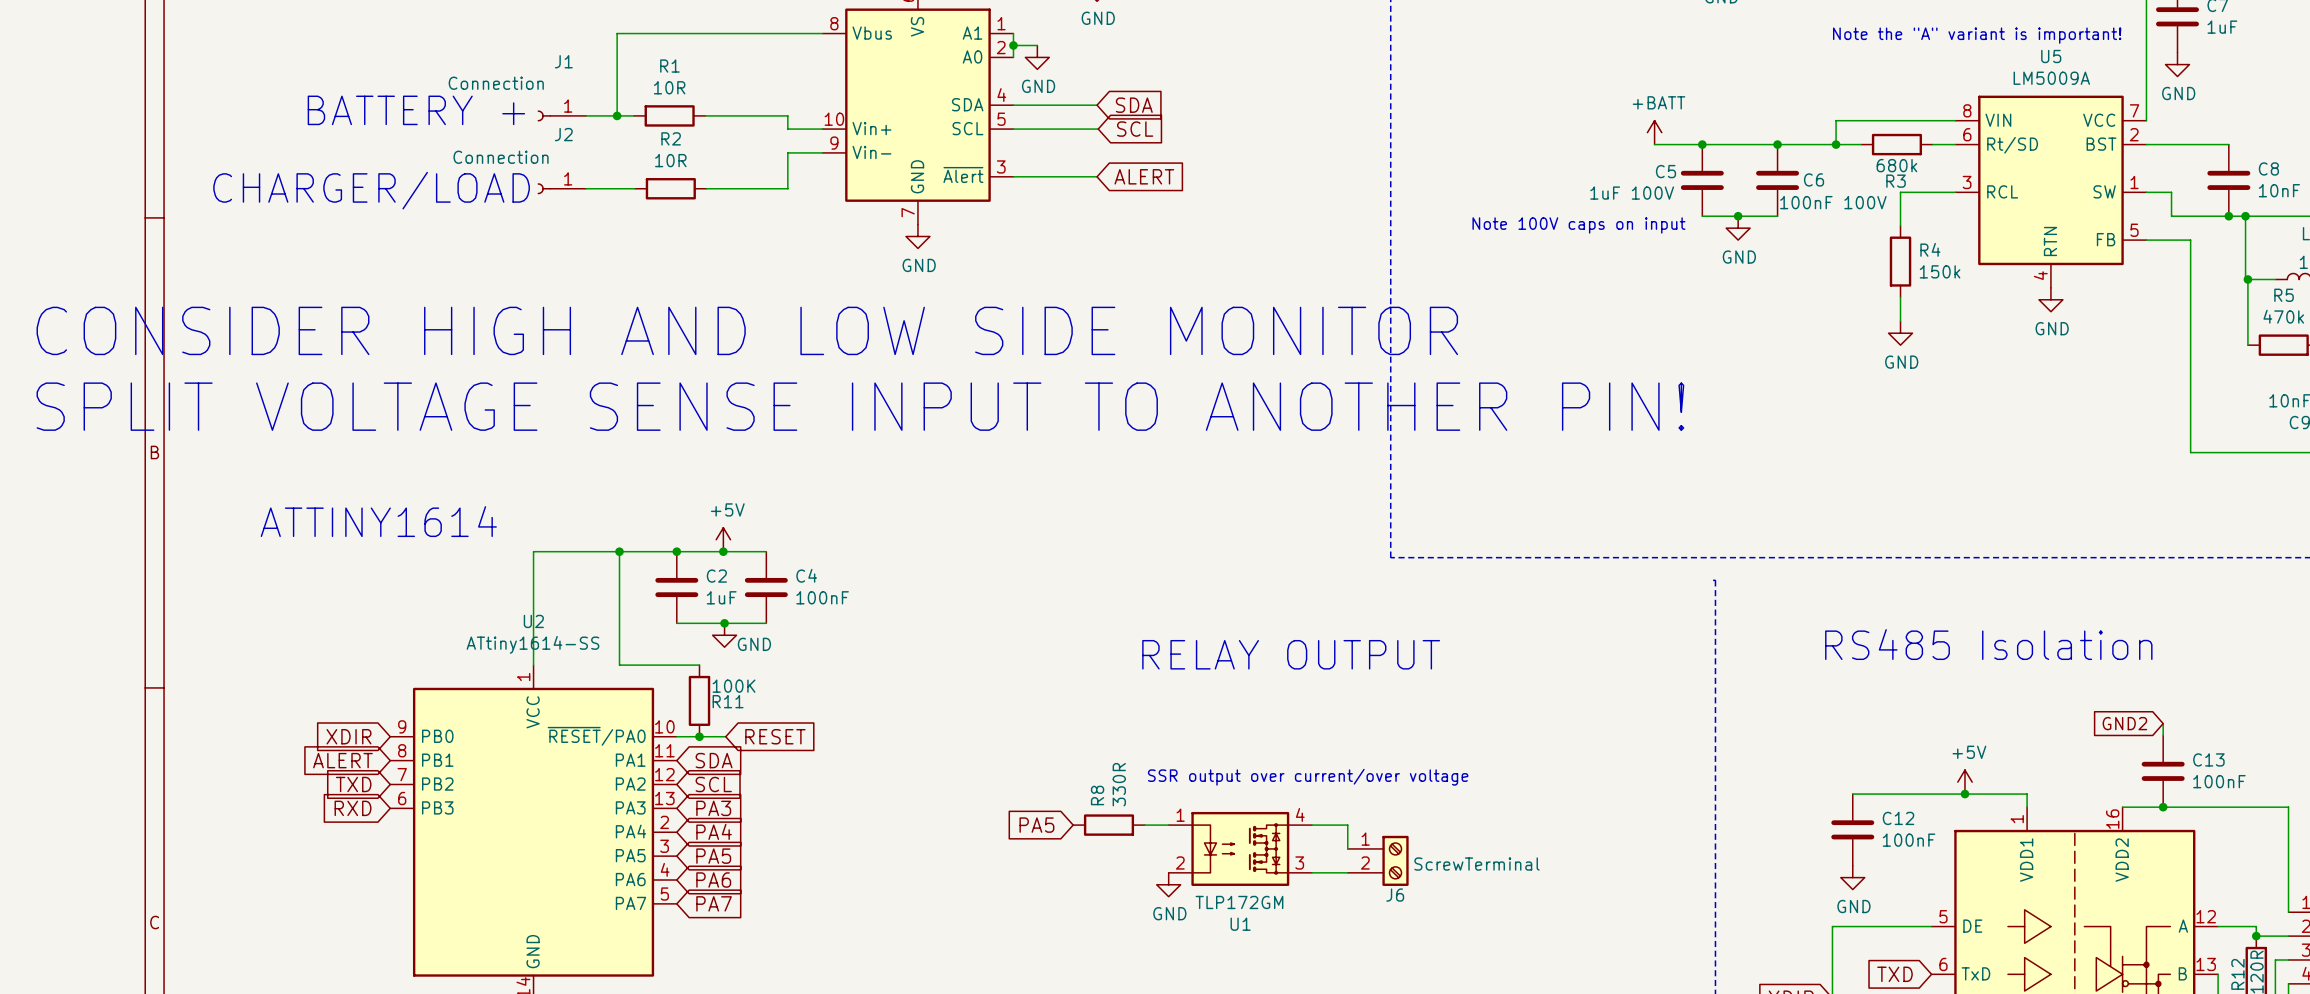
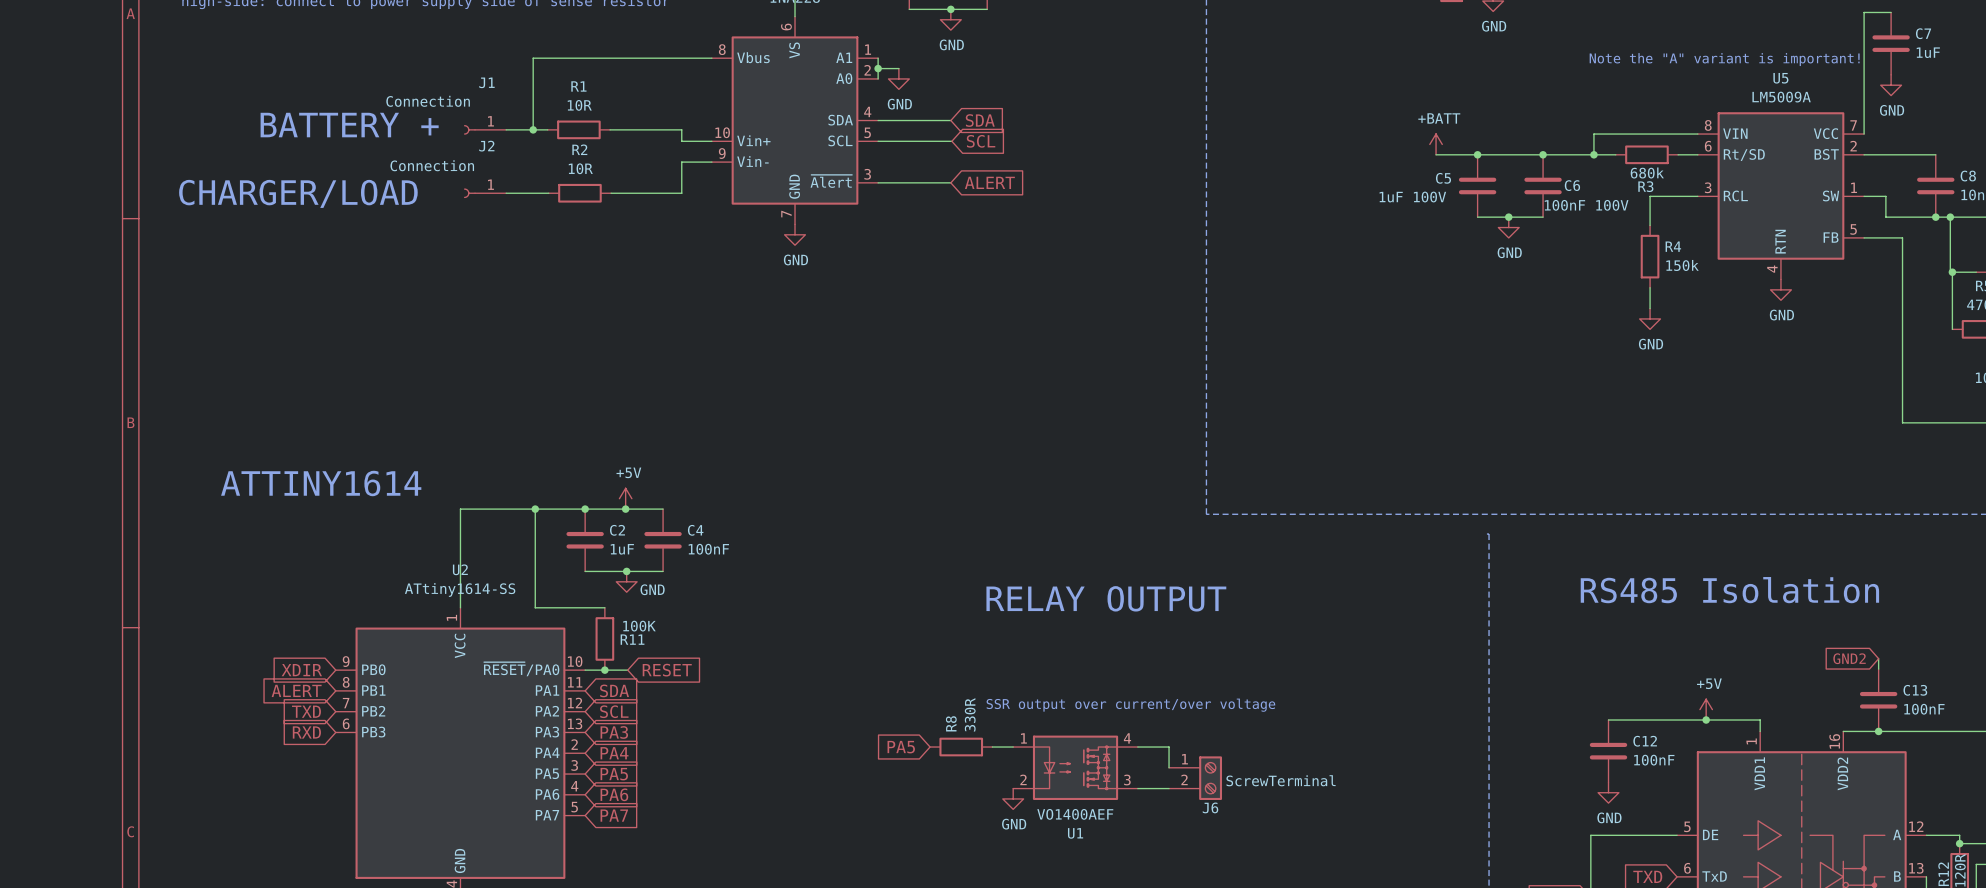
text: Note 100V caps on input (1578, 225) -> none
text: CONSIDER HIGH AND LOW SIDE MONITOR (747, 330) -> none
text: SPLIT VOLTAGE SENSE INPUT TO ANOTHER PIN! (860, 406) -> none
U1 value: TLP172GM (1239, 902) -> VO1400AEF (1075, 814)

